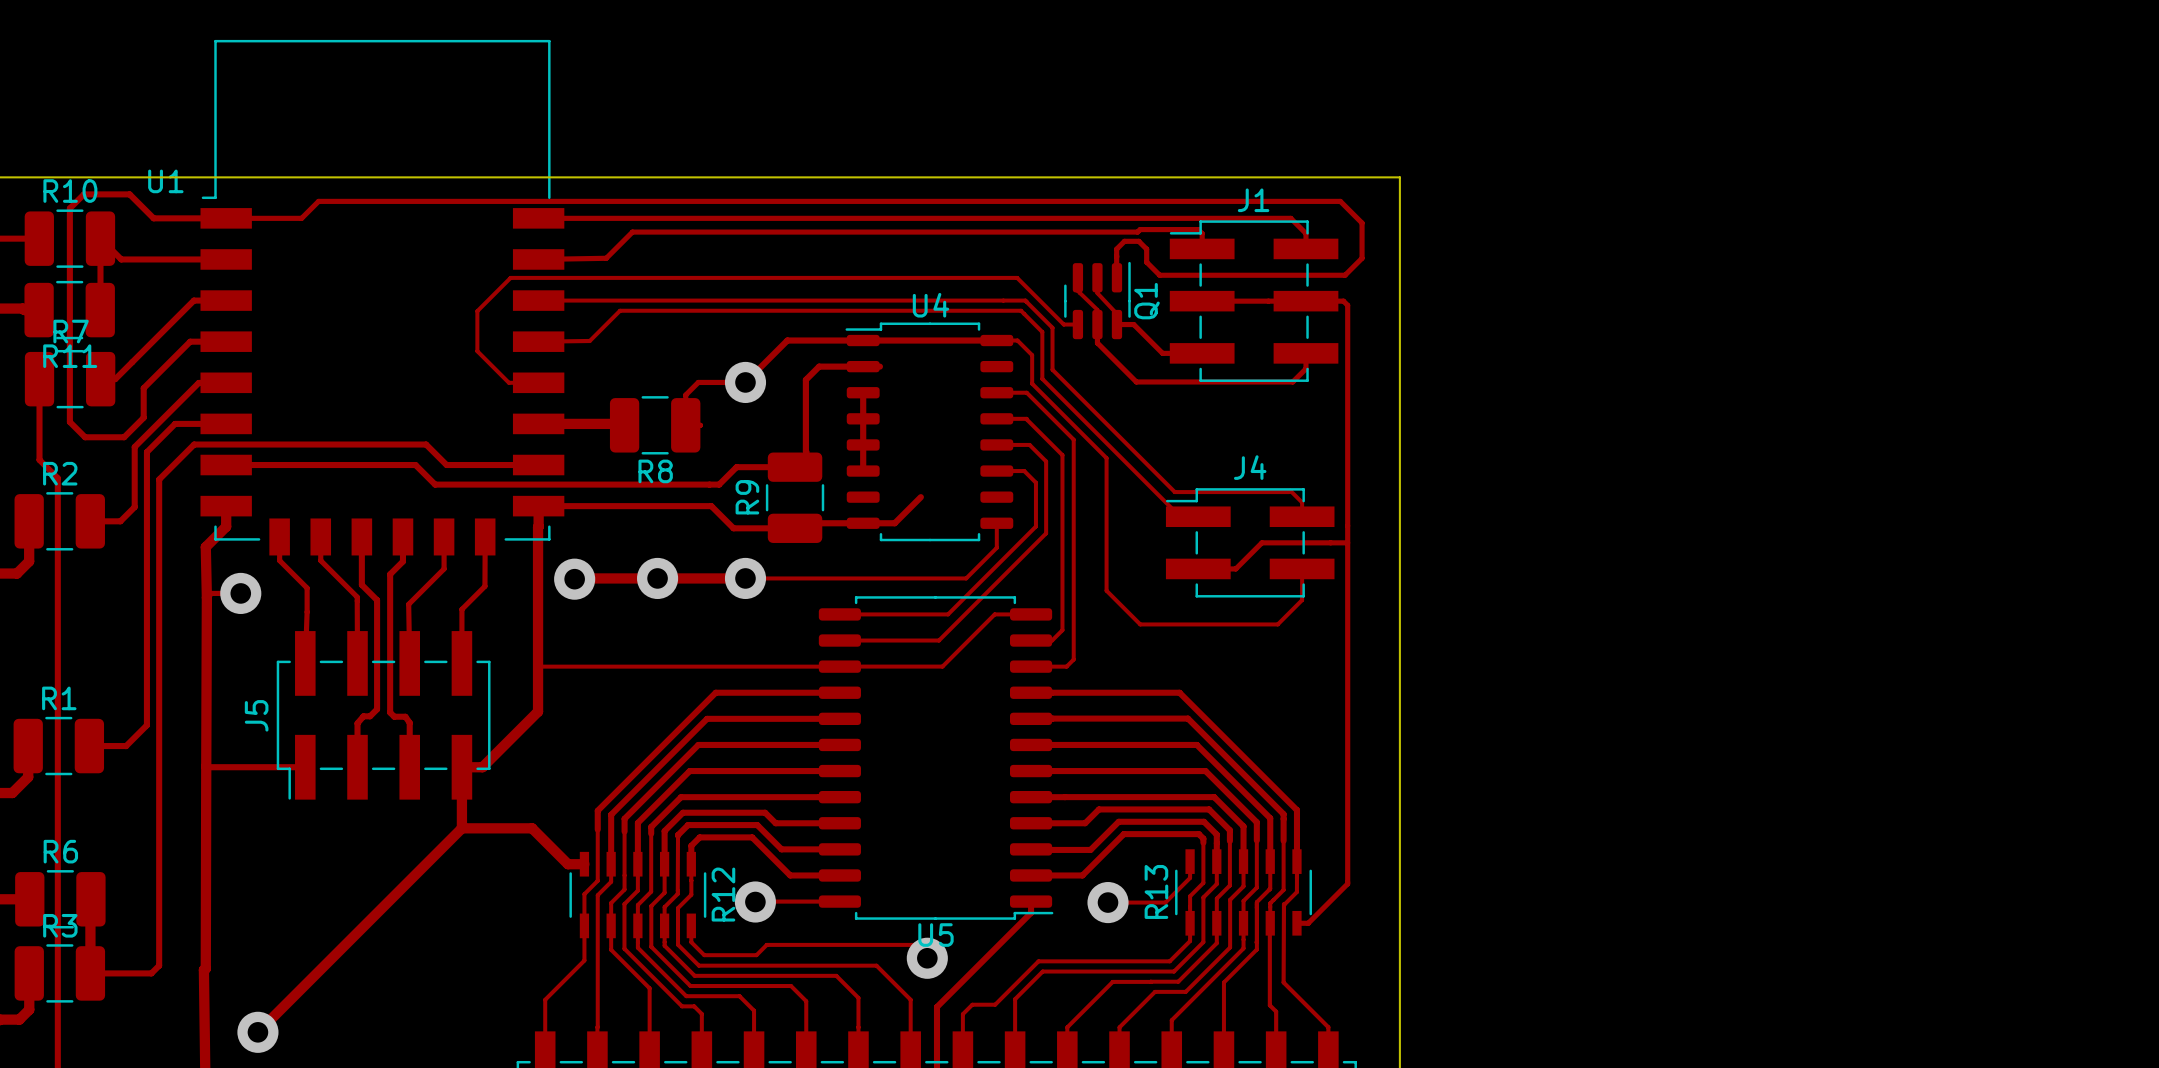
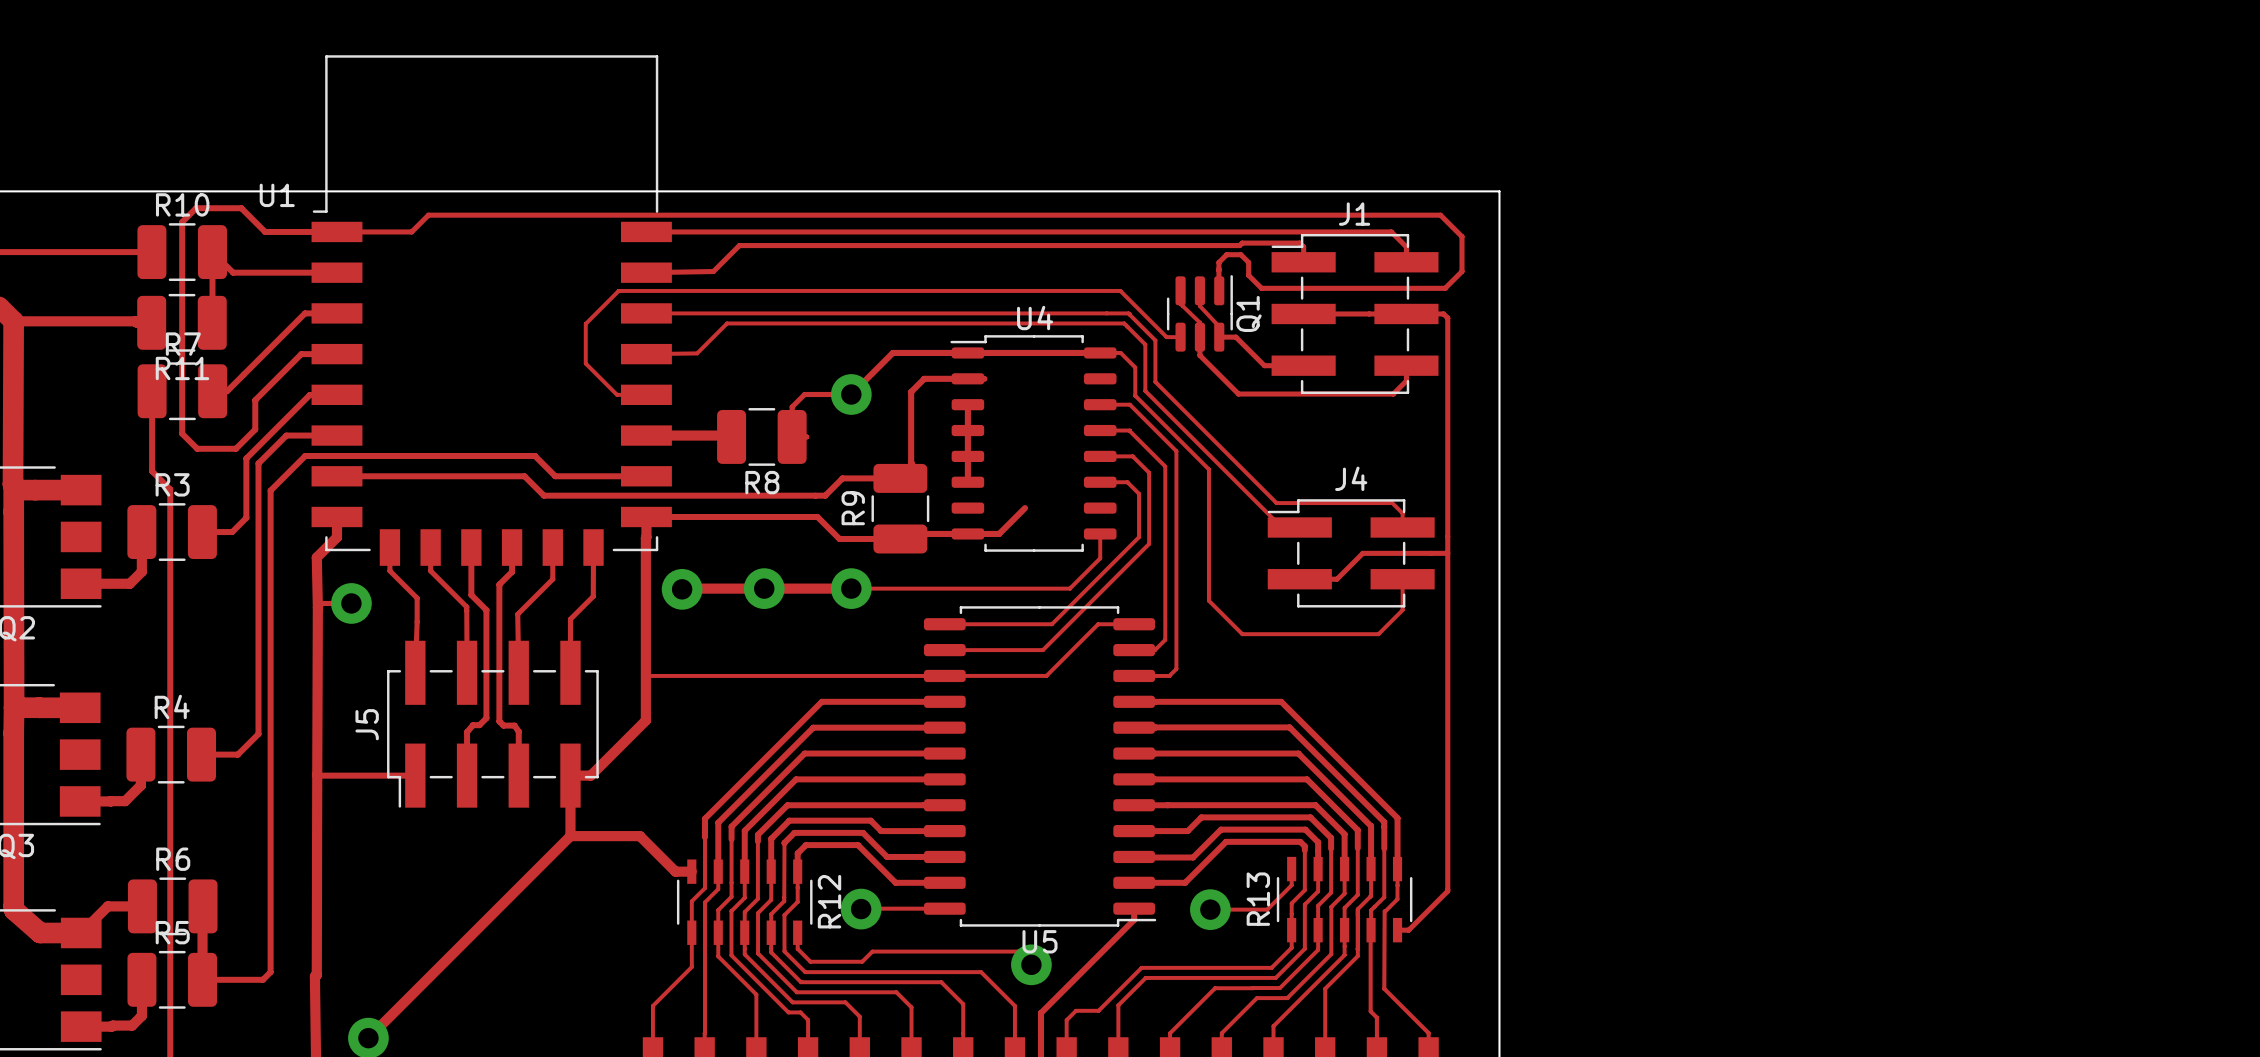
R2 name: R2 (60, 473) -> R3 (172, 484)
R1 name: R1 (59, 698) -> R4 (172, 706)
R3 name: R3 (60, 925) -> R5 (172, 932)

